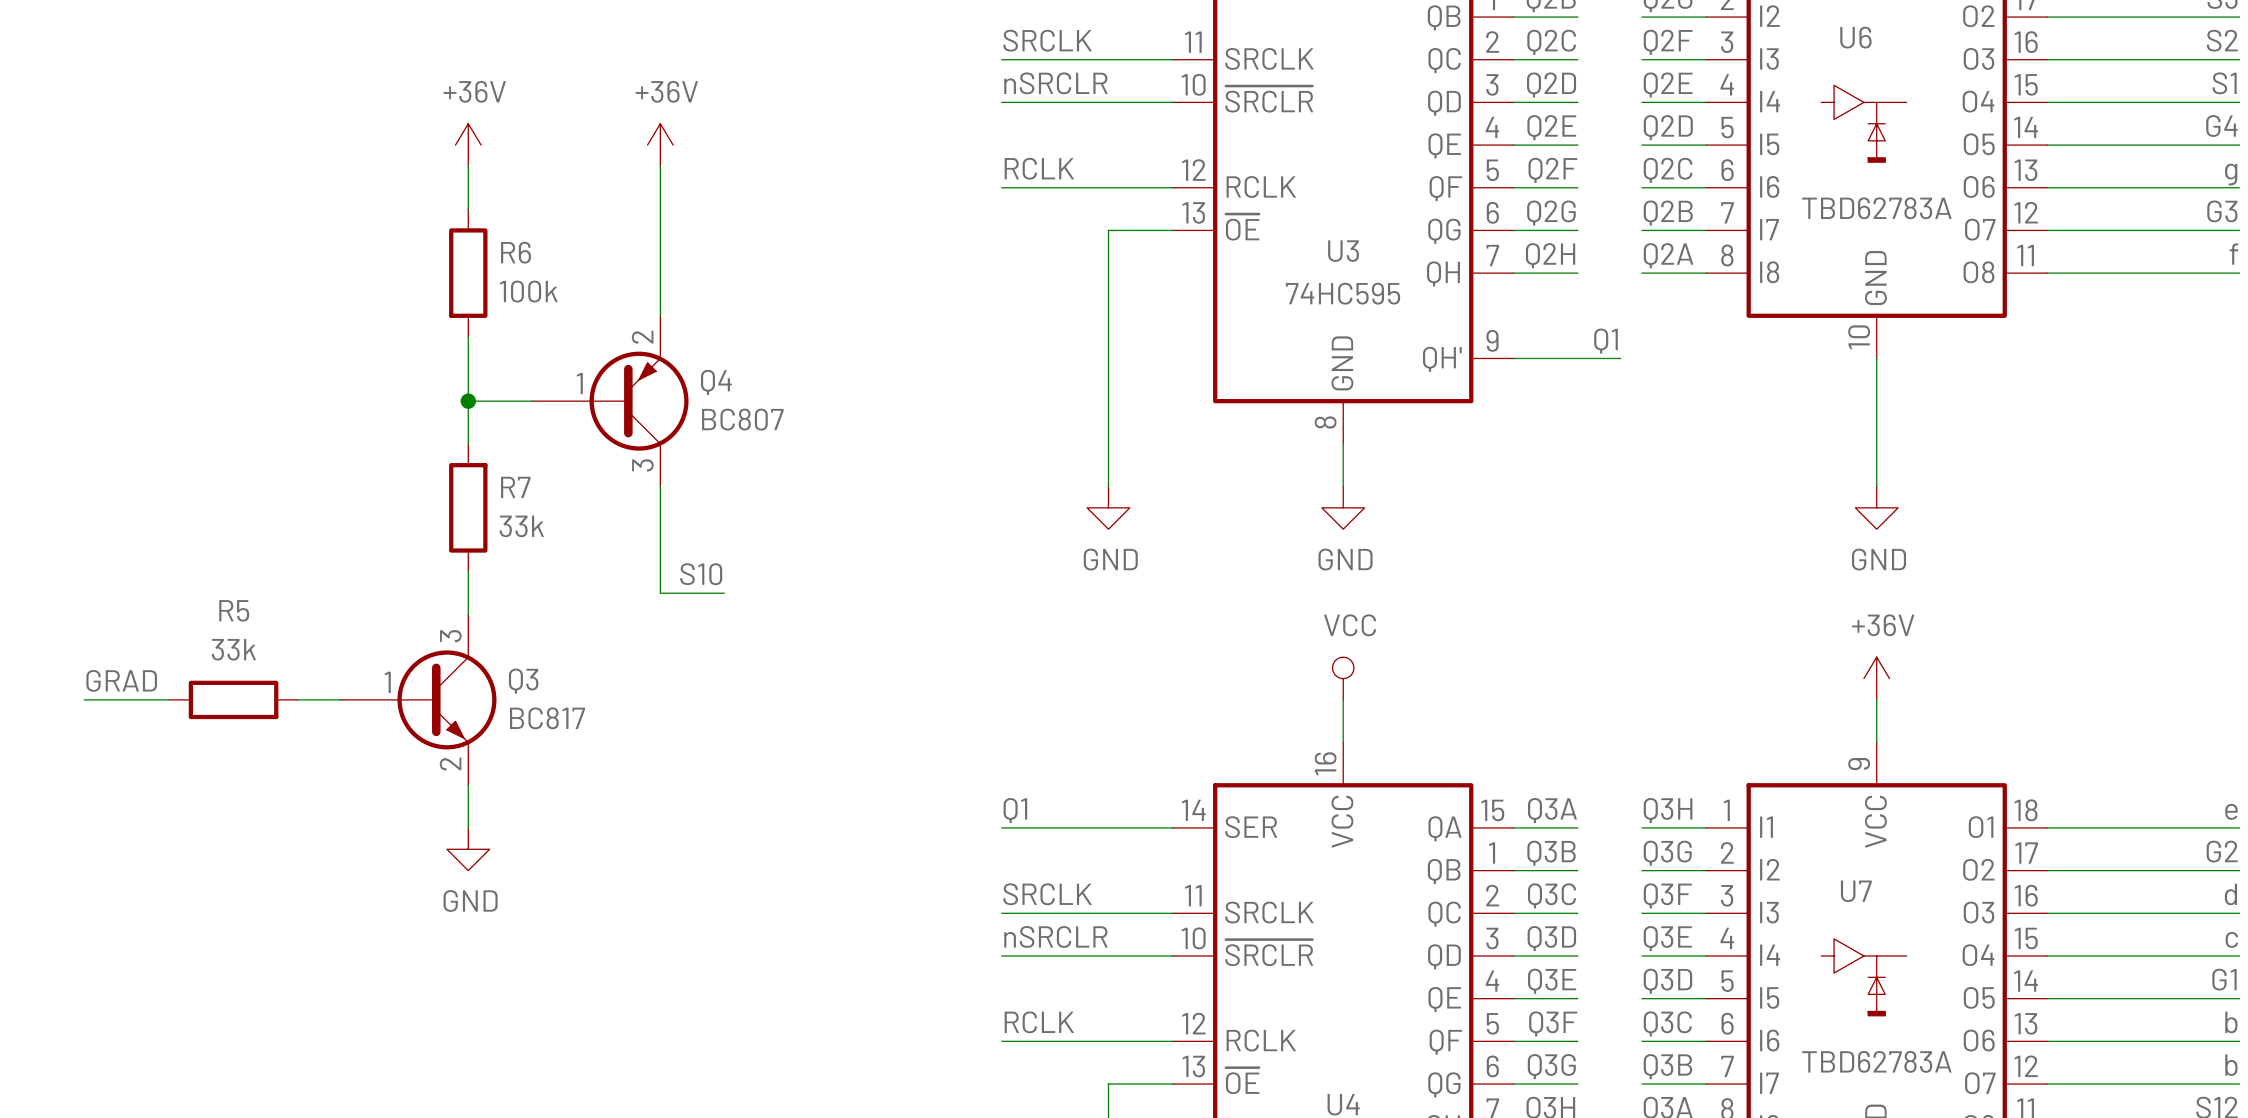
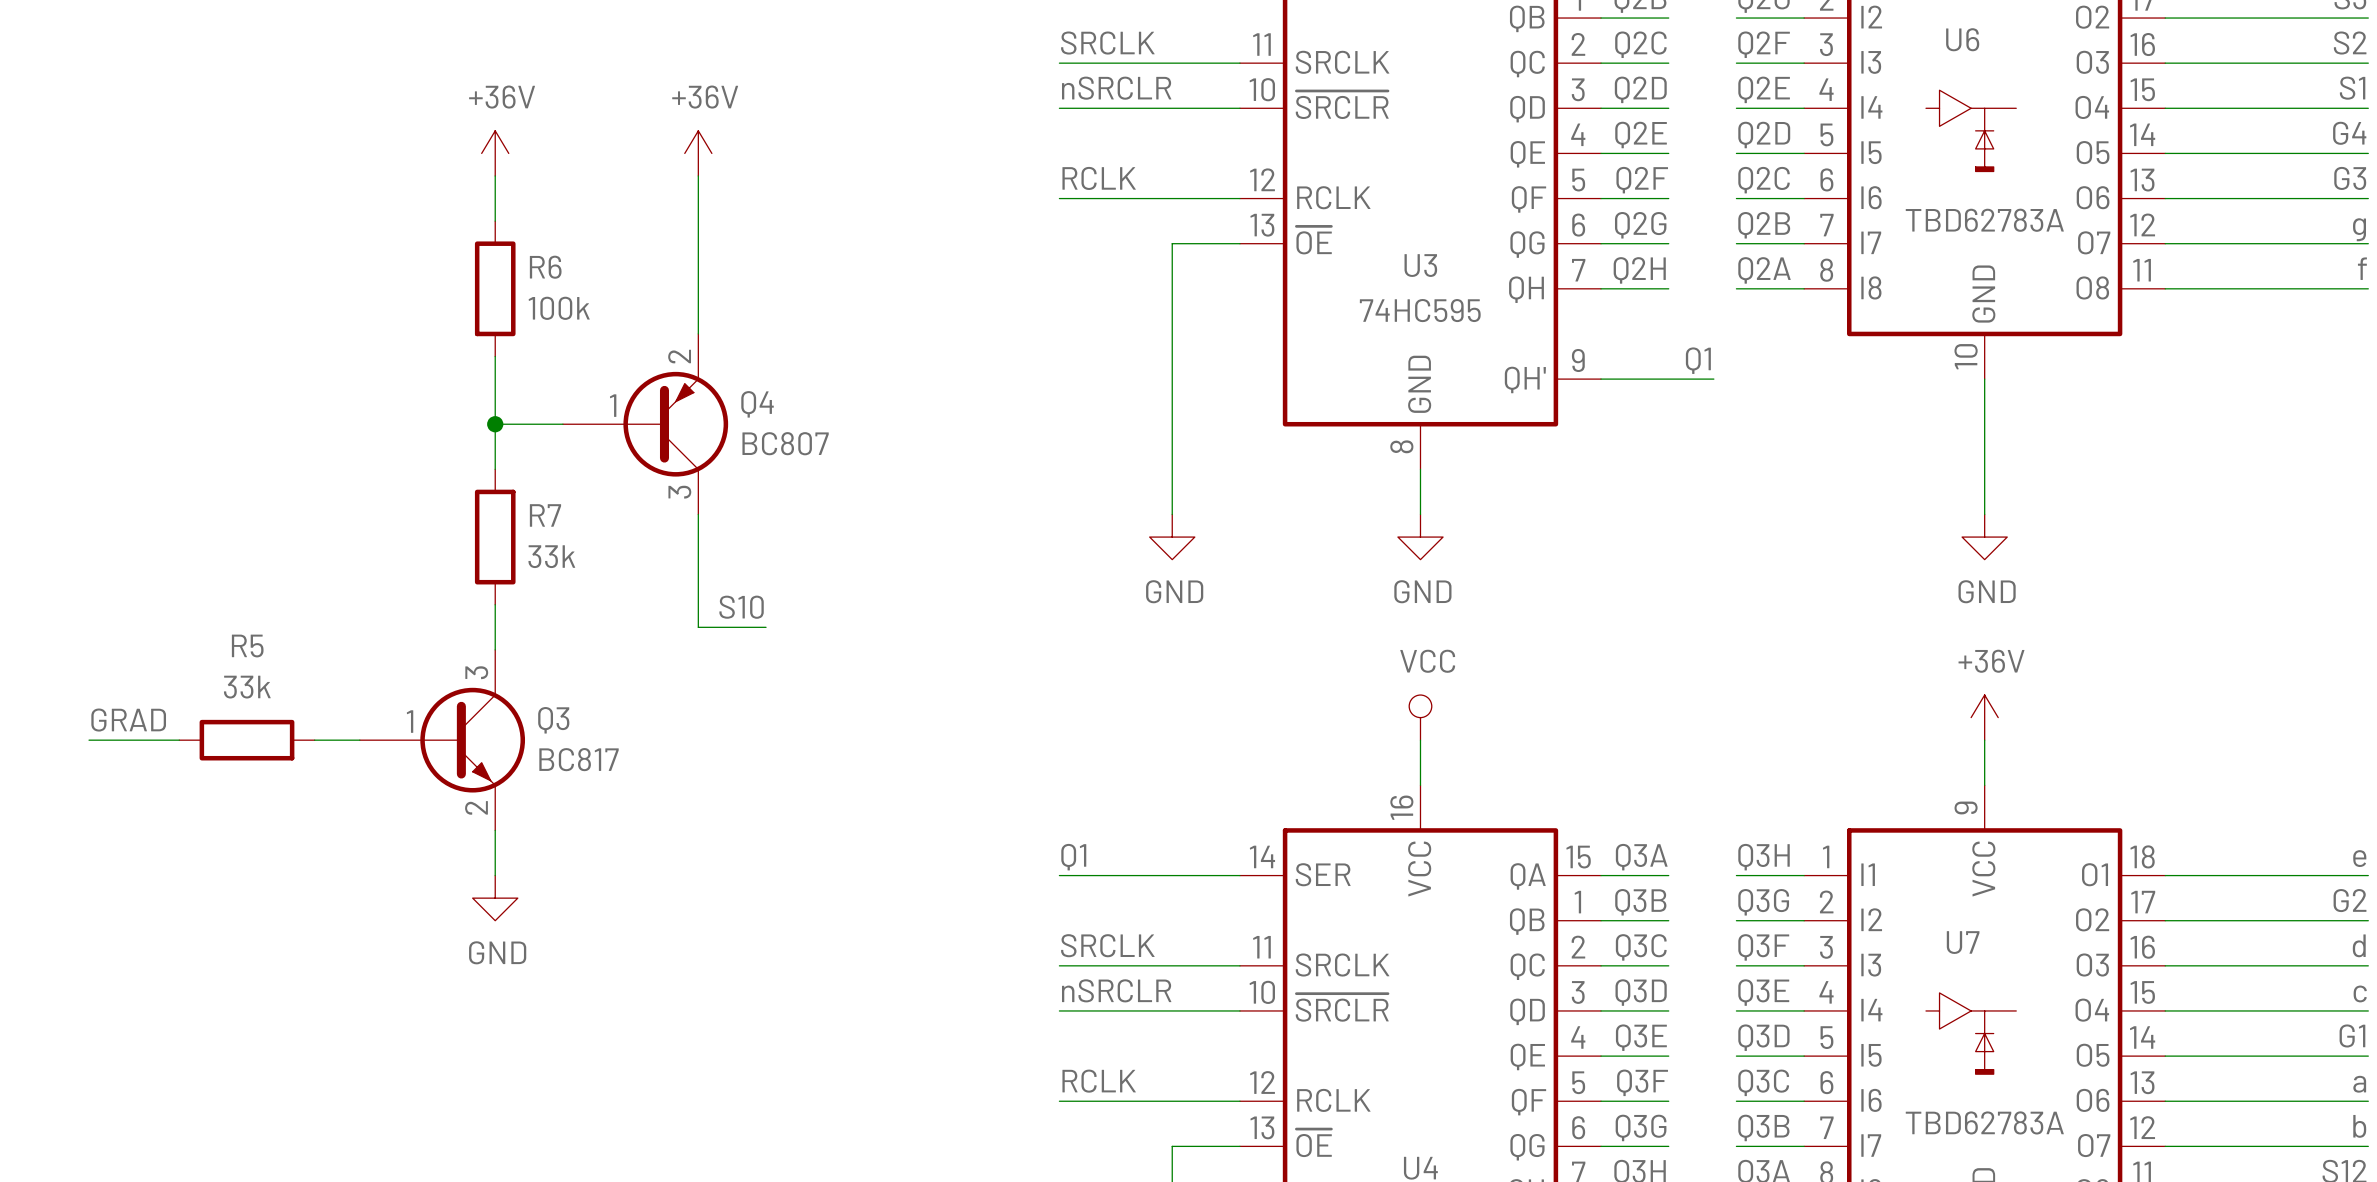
label: g (2231, 174) -> G3 (2350, 178)
label: G3 (2222, 211) -> g (2359, 229)
label: b (2231, 1022) -> a (2359, 1084)

